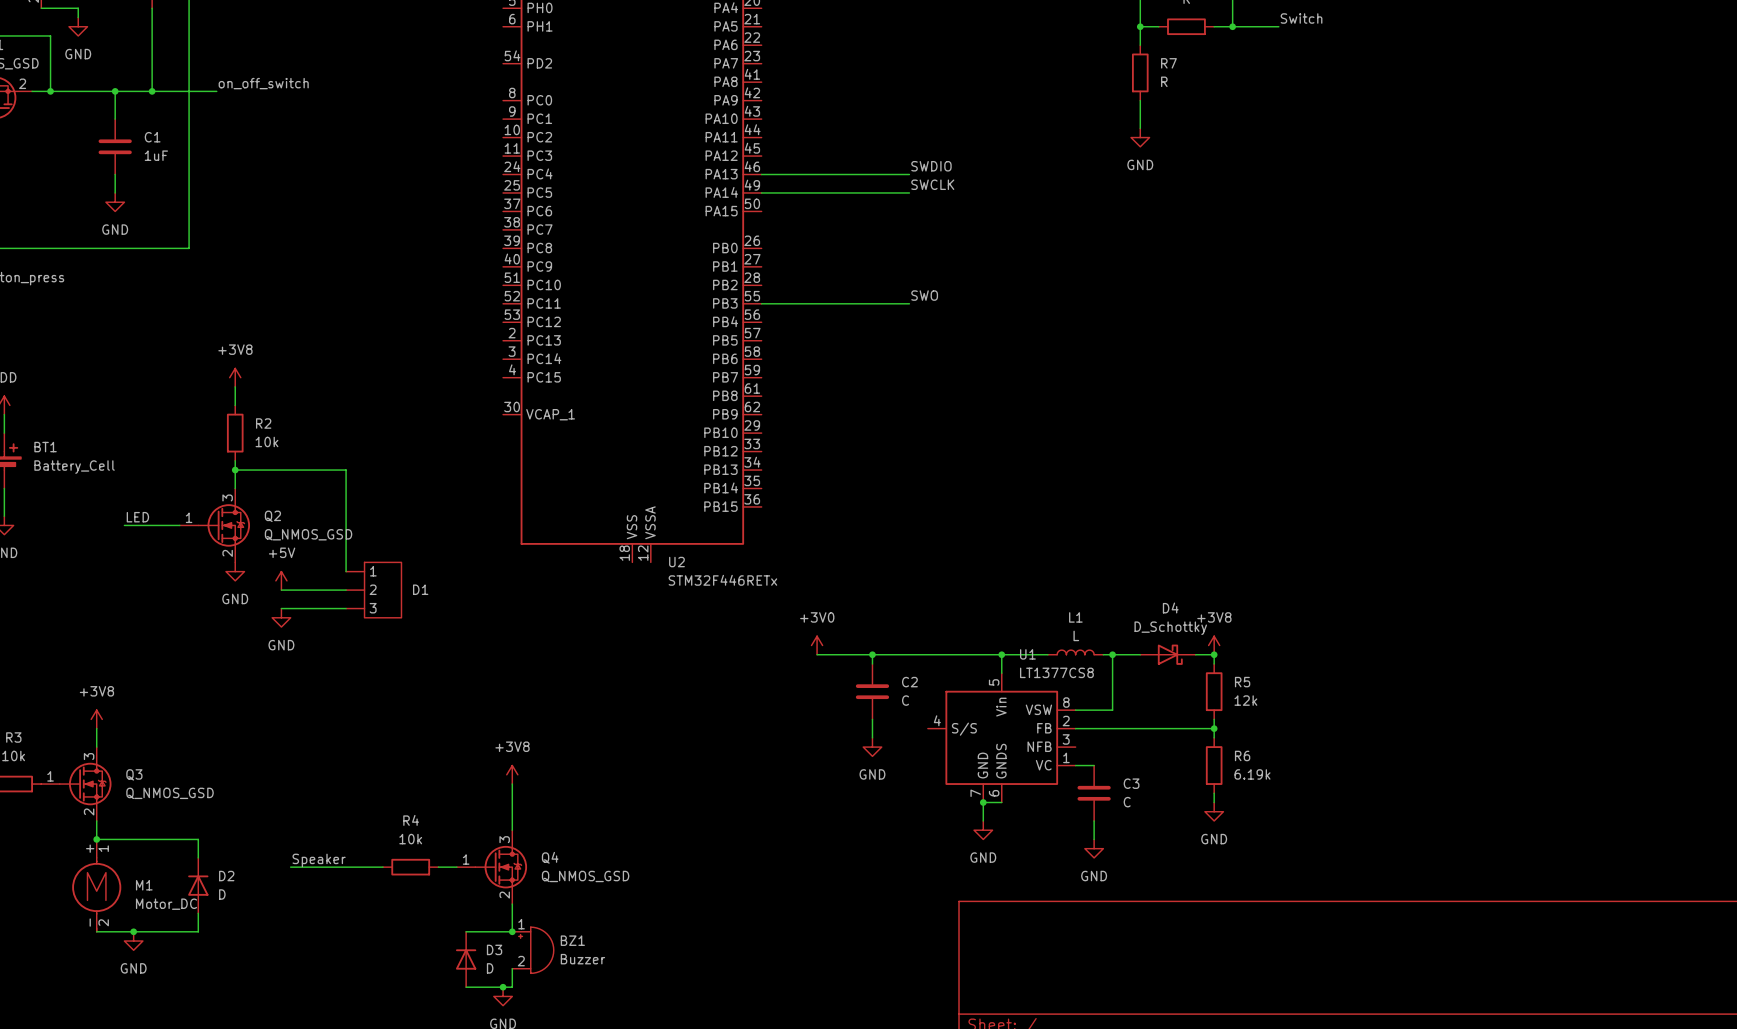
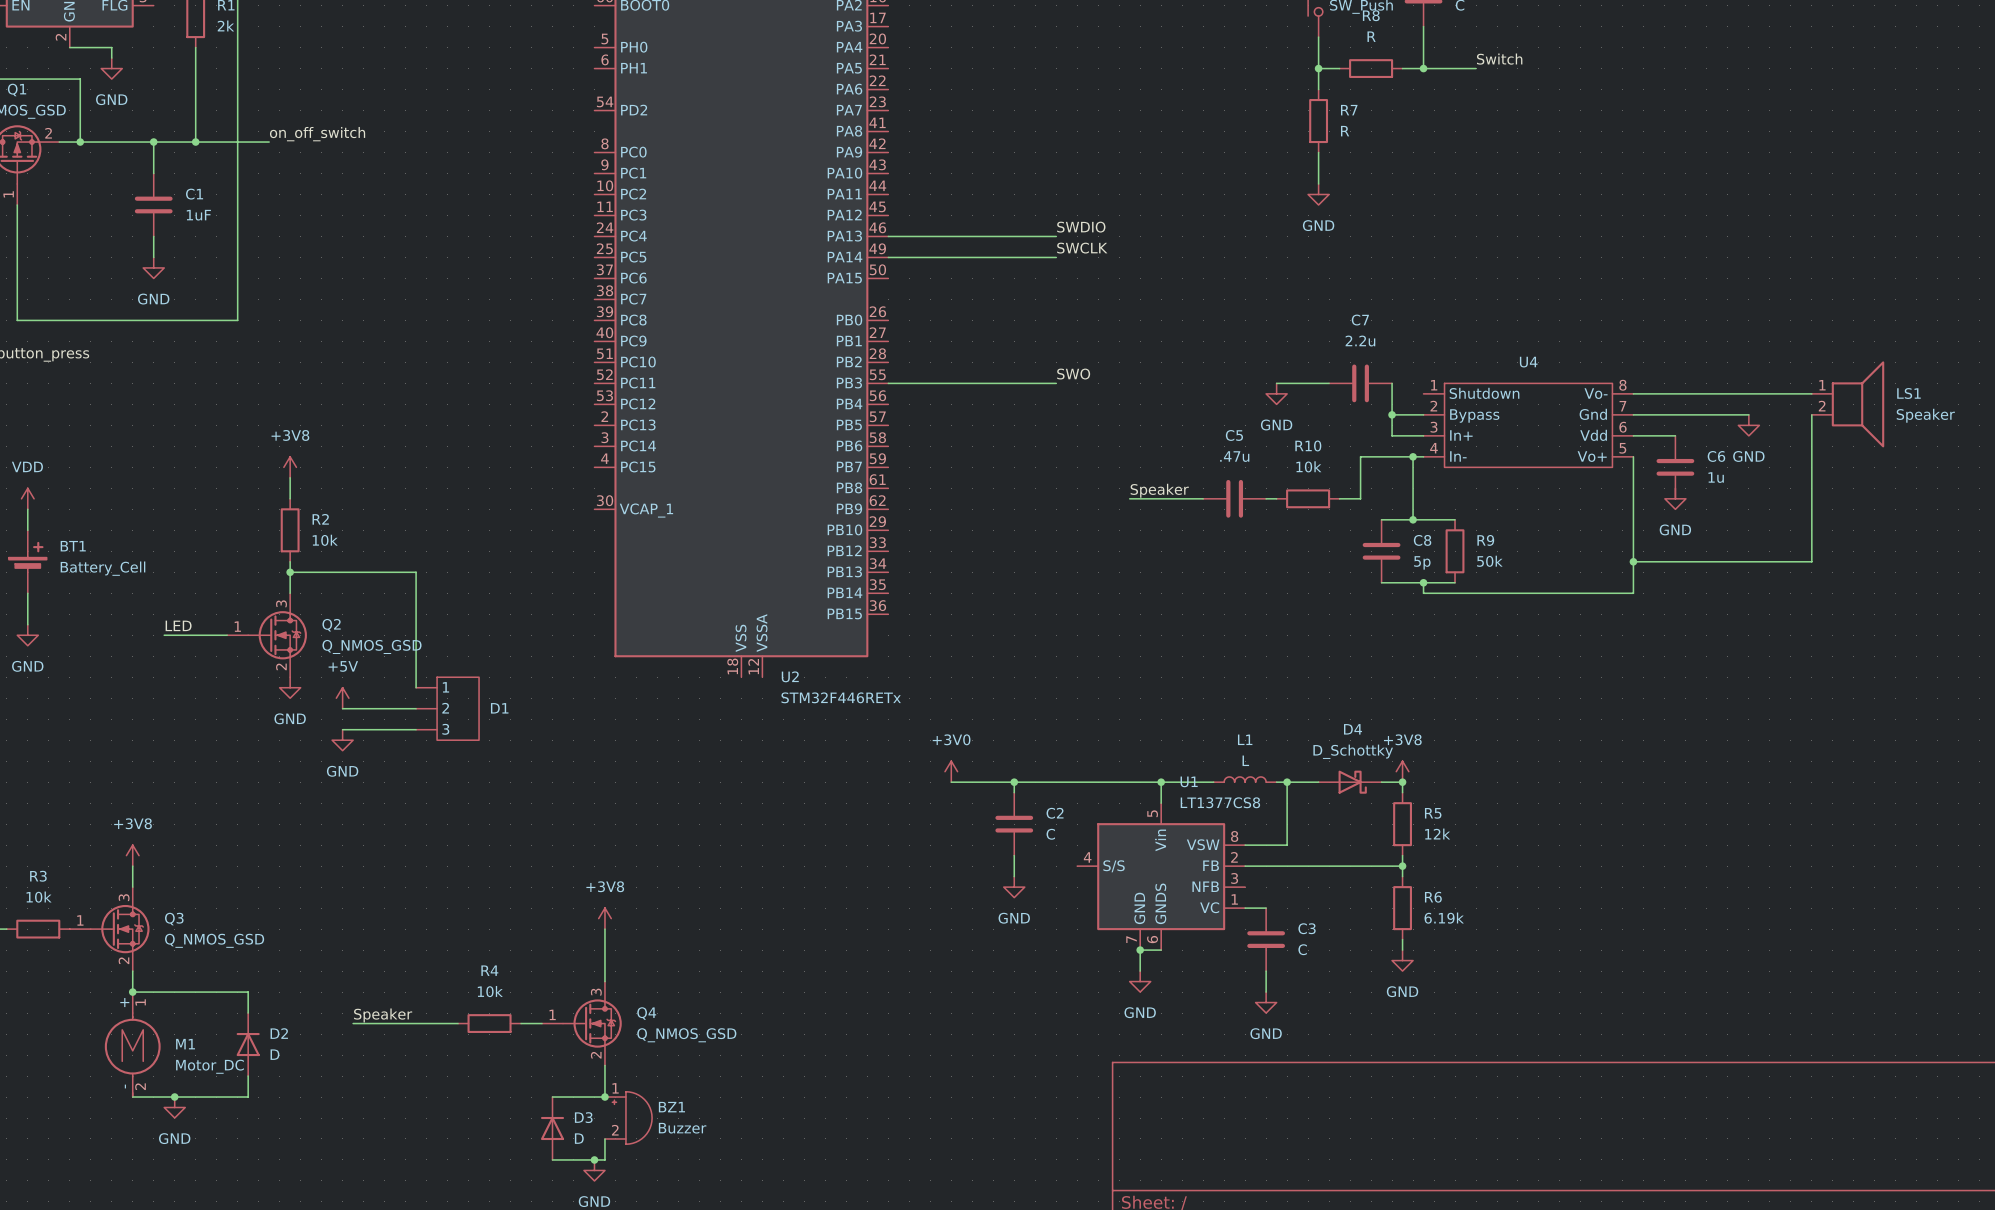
wire: none -> (1276, 383) (1329, 383)
C7: none -> 2.2u (1360, 383)
wire: none -> (1392, 383) (1392, 435) (1423, 435)
power symbol: none -> GND (1276, 393)
wire: none -> (1633, 393) (1811, 393)
LS1: none -> Speaker (1848, 404)
wire: none -> (1392, 414) (1423, 414)
junction: none -> (1392, 414)
wire: none -> (1633, 414) (1748, 414)
wire: none -> (1811, 414) (1811, 561) (1633, 561)
U4: none -> (1528, 425)
power symbol: none -> GND (1748, 425)
wire: none -> (1633, 435) (1675, 435)
wire: none -> (1413, 456) (1413, 519)
junction: none -> (1413, 456)
wire: none -> (1423, 456) (1360, 456) (1360, 498) (1339, 498)
wire: none -> (1633, 456) (1633, 593) (1423, 593) (1423, 582)
C6: none -> 1u (1675, 467)
label: none -> Speaker (1159, 490)
wire: none -> (1129, 498) (1203, 498)
C5: none -> .47u (1234, 498)
wire: none -> (1266, 498) (1276, 498)
R10: none -> 10k (1308, 498)
power symbol: none -> GND (1675, 498)
wire: none -> (1381, 519) (1455, 519)
junction: none -> (1413, 519)
C8: none -> 5p (1381, 551)
R9: none -> 50k (1455, 551)
junction: none -> (1633, 561)
wire: none -> (1381, 582) (1455, 582)
junction: none -> (1423, 582)

